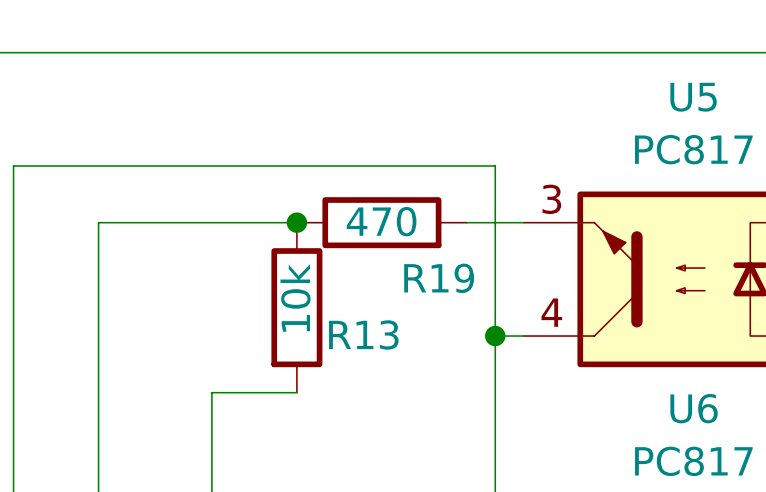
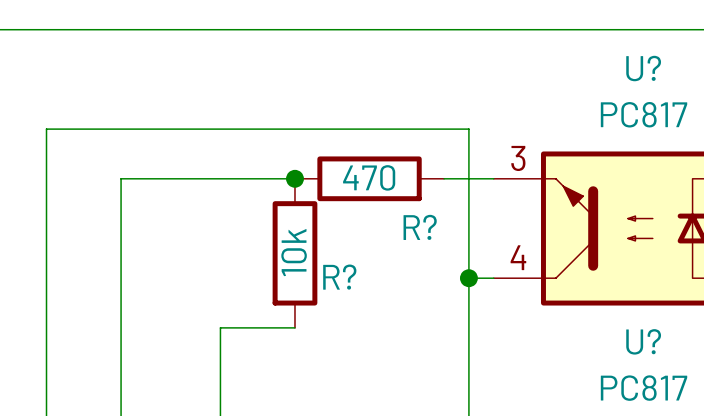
U5 name: U5 (693, 97) -> U? (643, 68)
R19 name: R19 (439, 278) -> R? (420, 227)
R13 name: R13 (363, 334) -> R? (339, 277)
U6 name: U6 (694, 408) -> U? (643, 341)

